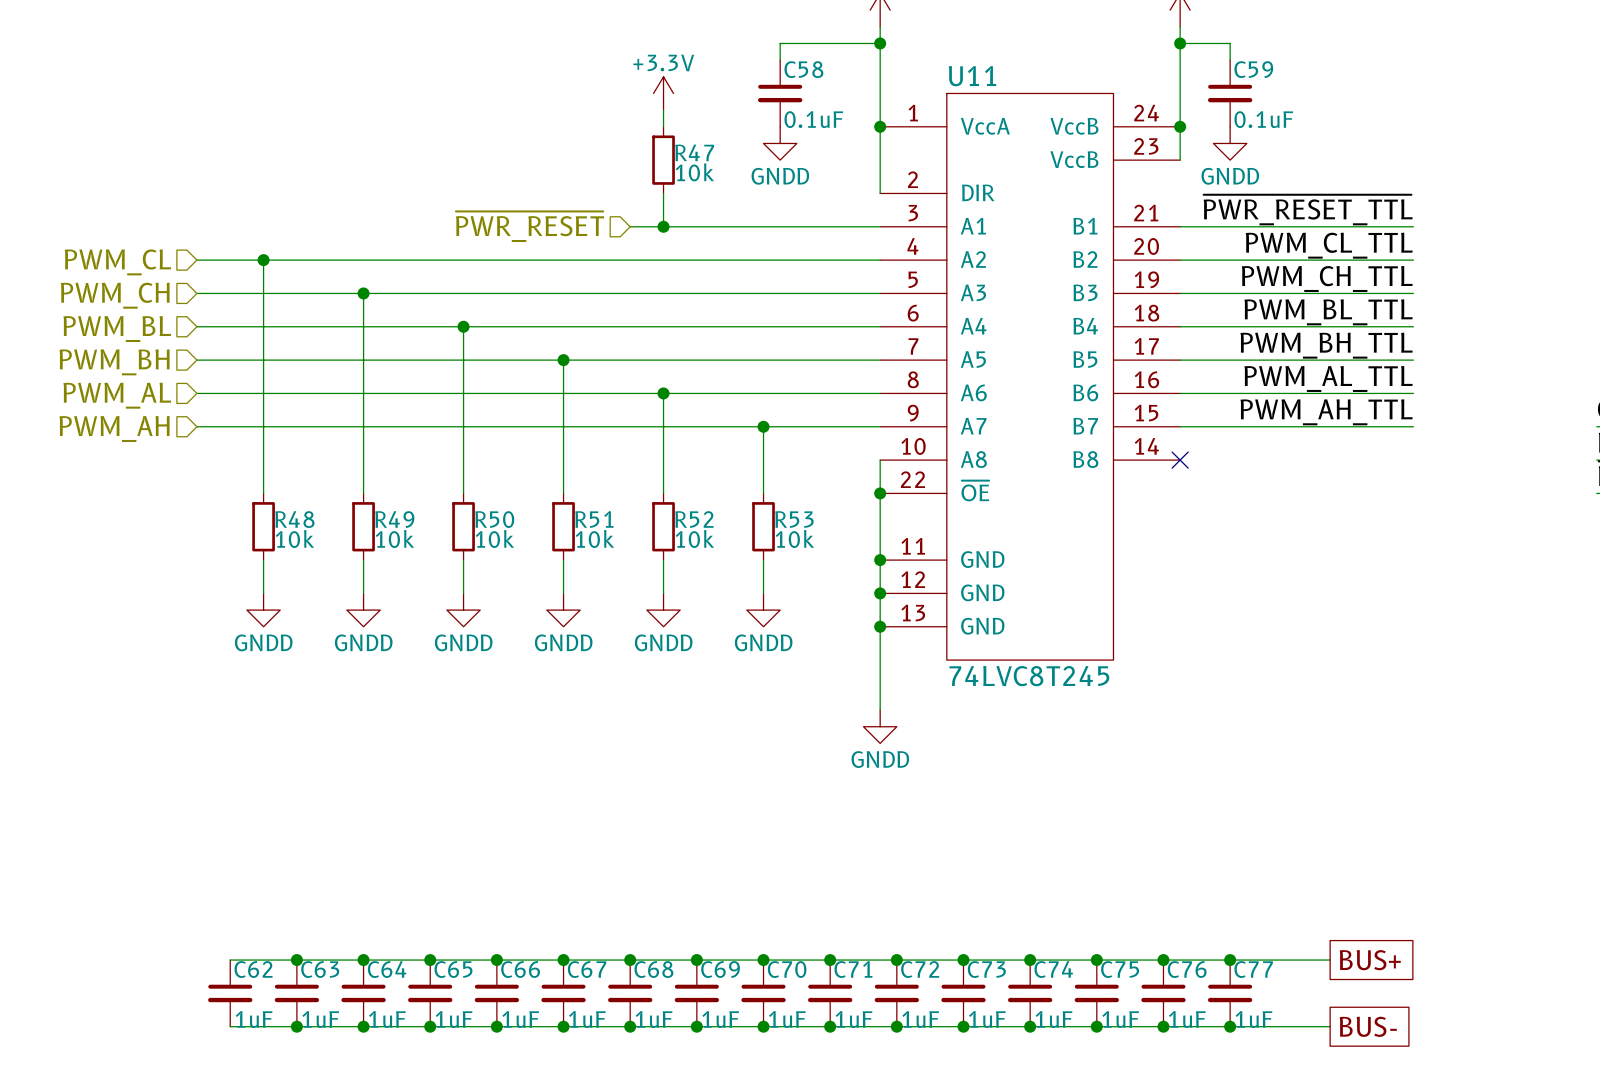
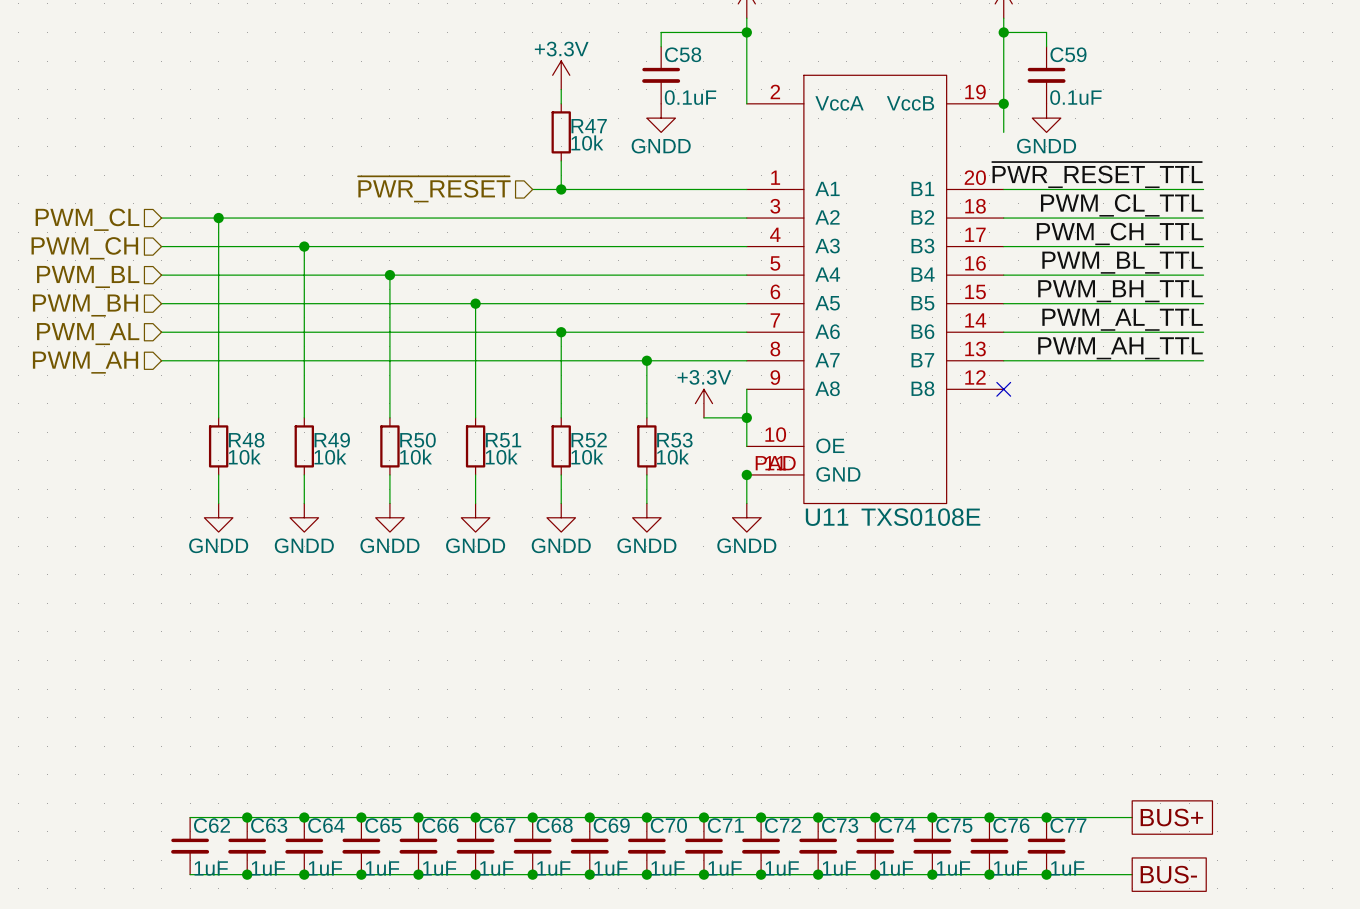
U11 name position: U11 (972, 76) -> U11 (827, 517)
U11 symbol: [880, 93, 1181, 661] -> [746, 75, 1004, 504]
wire: (880, 126) (880, 193) -> none
junction: (880, 126) -> none
power symbol: none -> +3.3V (703, 403)
wire: none -> (703, 417) (746, 417)
wire: (880, 526) (880, 560) -> none
wire: (880, 593) (880, 710) -> none
junction: (880, 593) -> none
junction: (880, 626) -> none
U11 value: 74LVC8T245 (1029, 676) -> TXS0108E (920, 517)
power symbol position: GNDD (880, 726) -> GNDD (746, 517)

